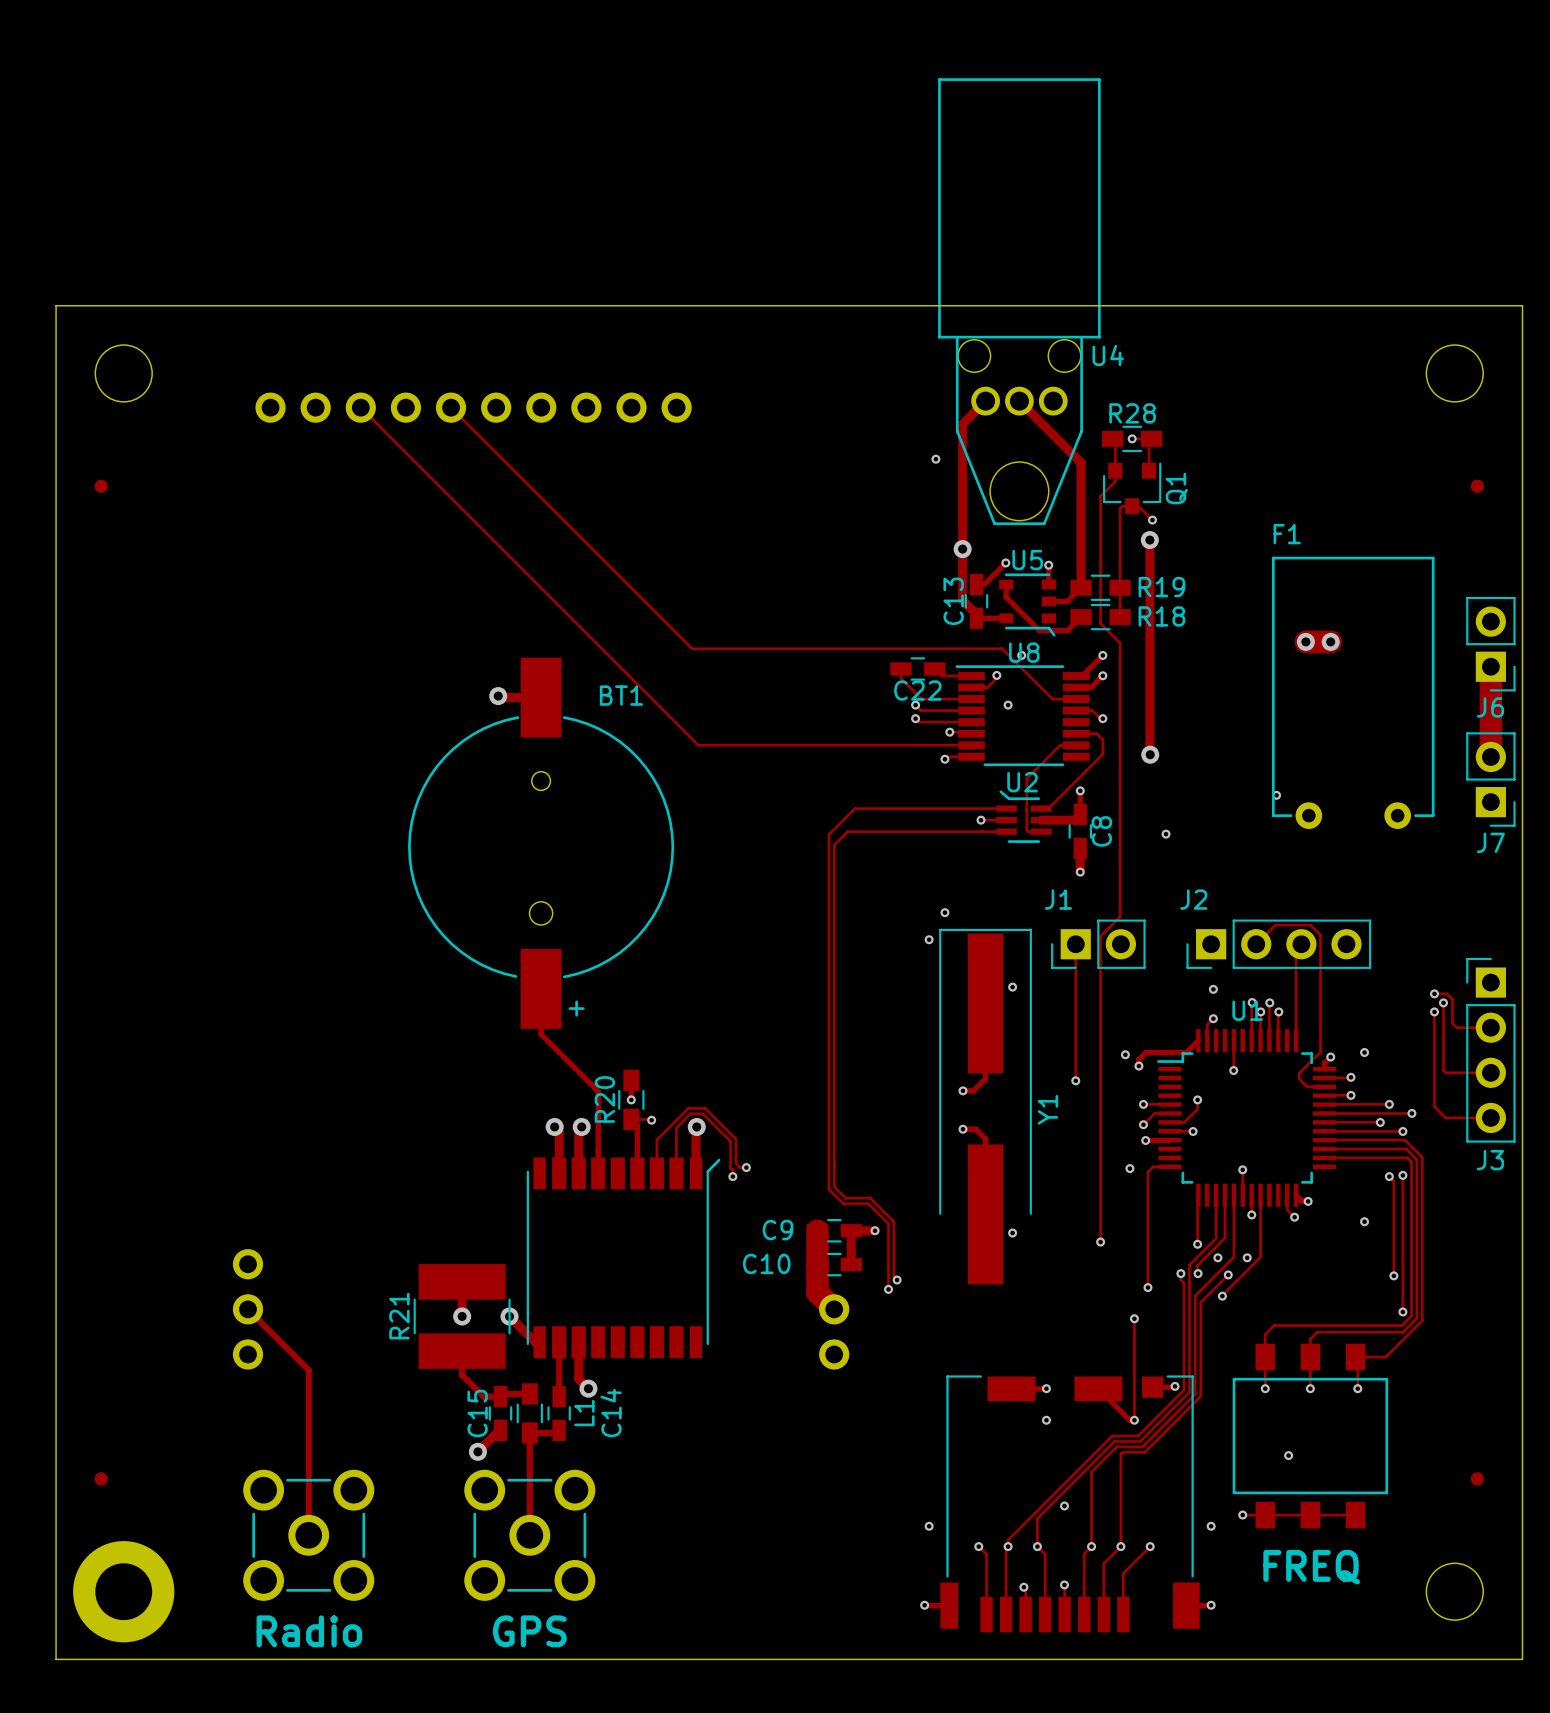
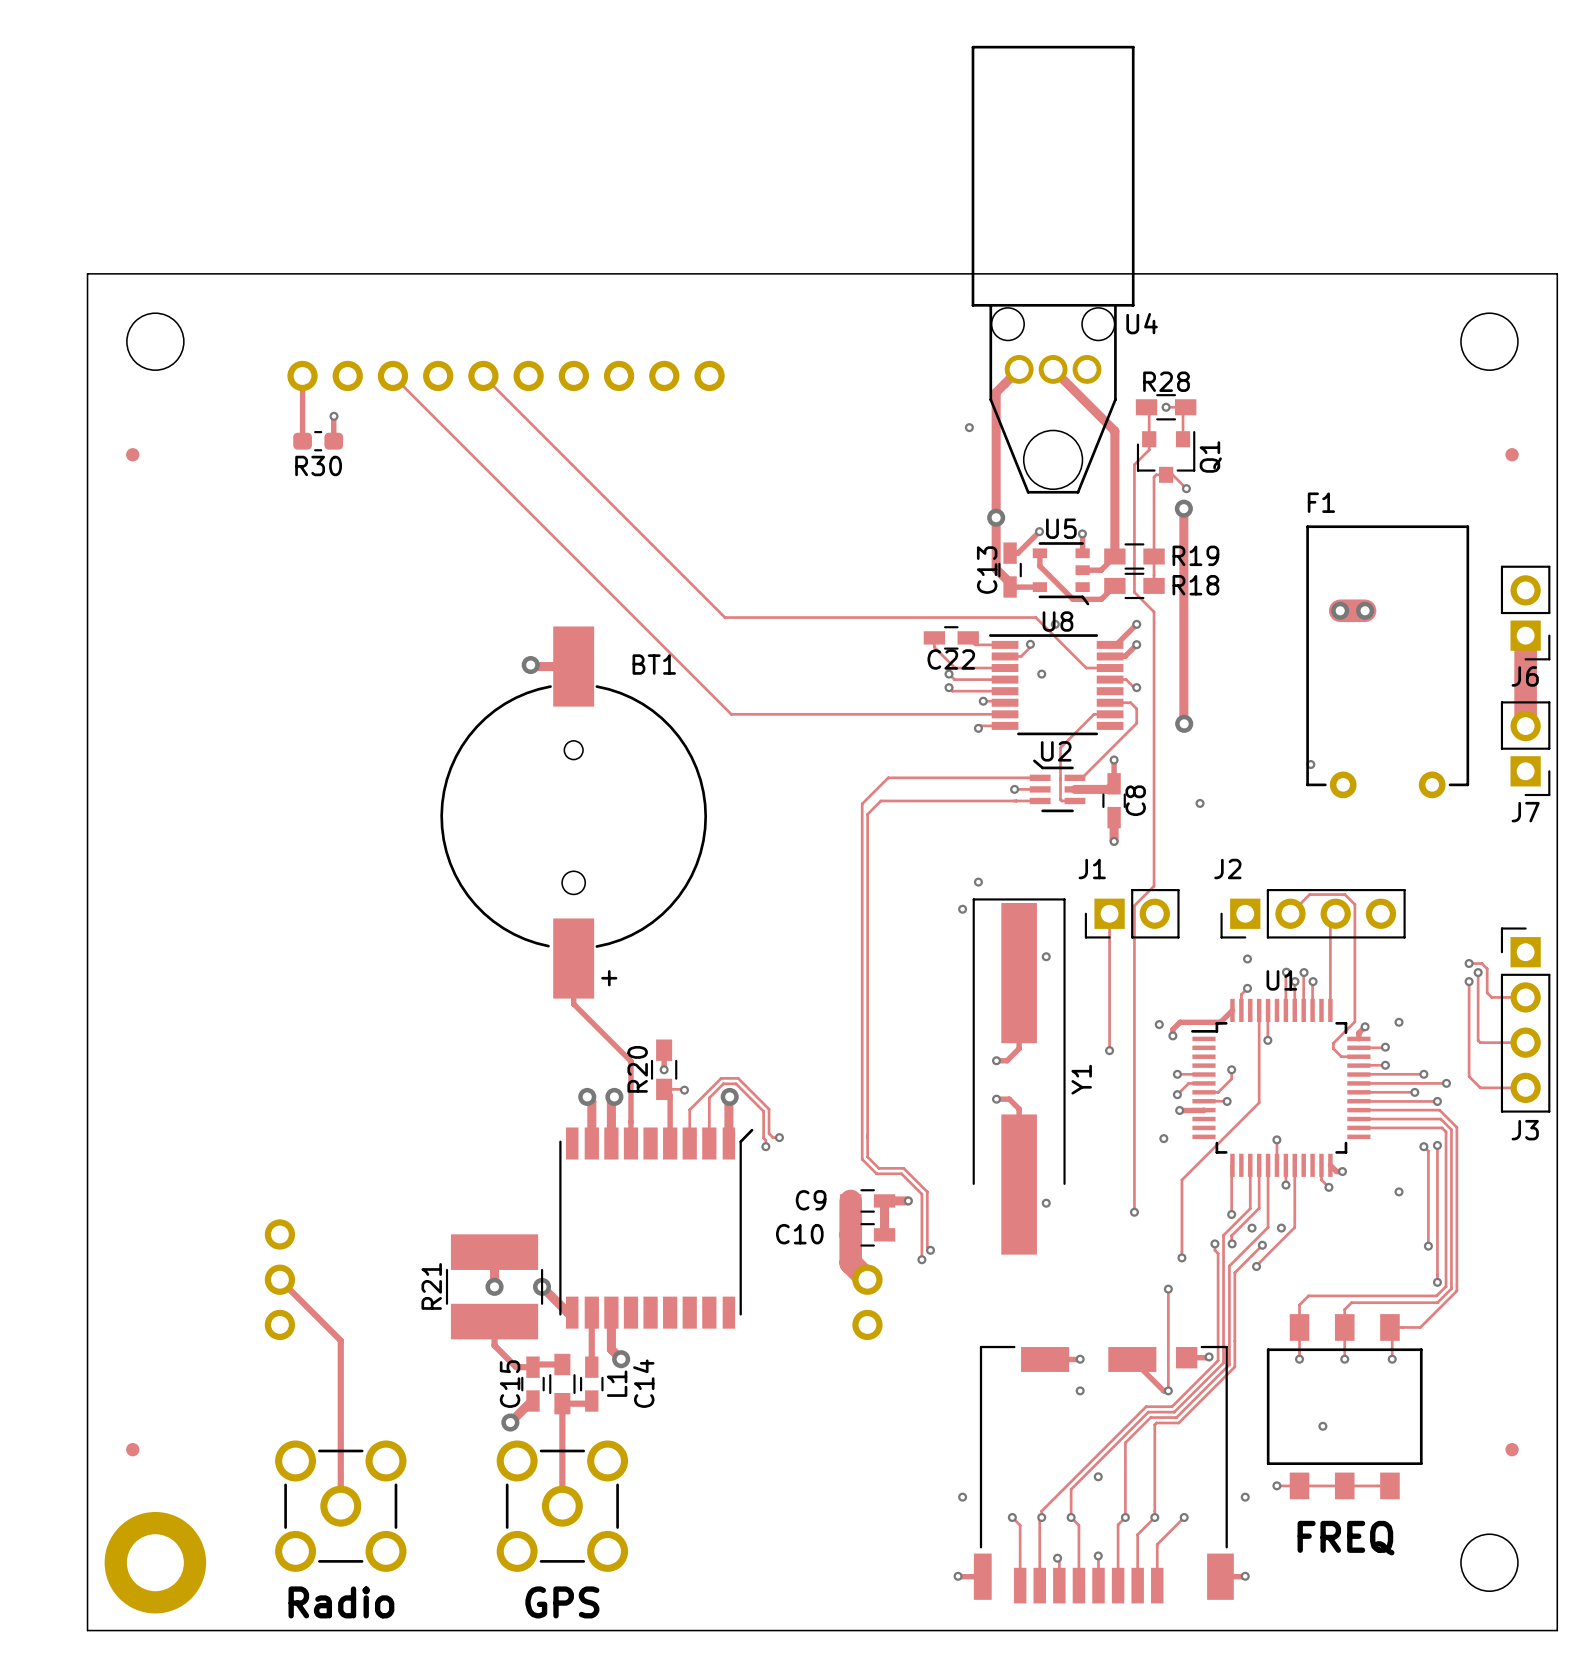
track: none -> (302, 376) (302, 441)
via: none -> (334, 416)
track: none -> (333, 416) (333, 441)
R30: none -> (318, 441)
track: (1169, 1166) (1153, 1166) (1147, 1172) (1147, 1209) -> (1259, 1010) (1259, 1102) (1181, 1180)

